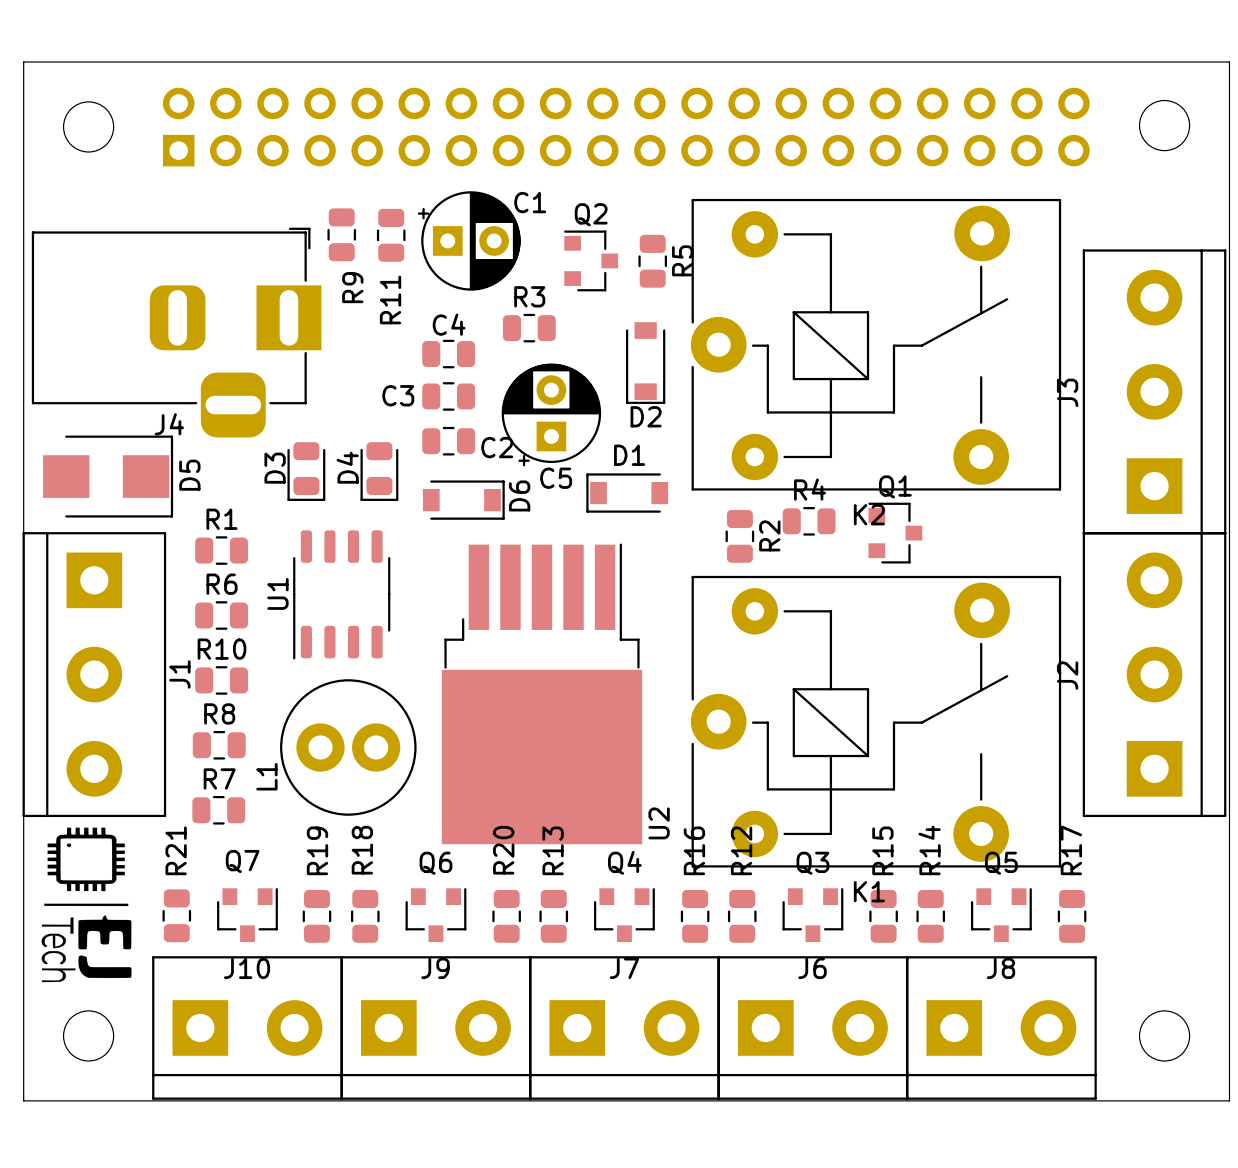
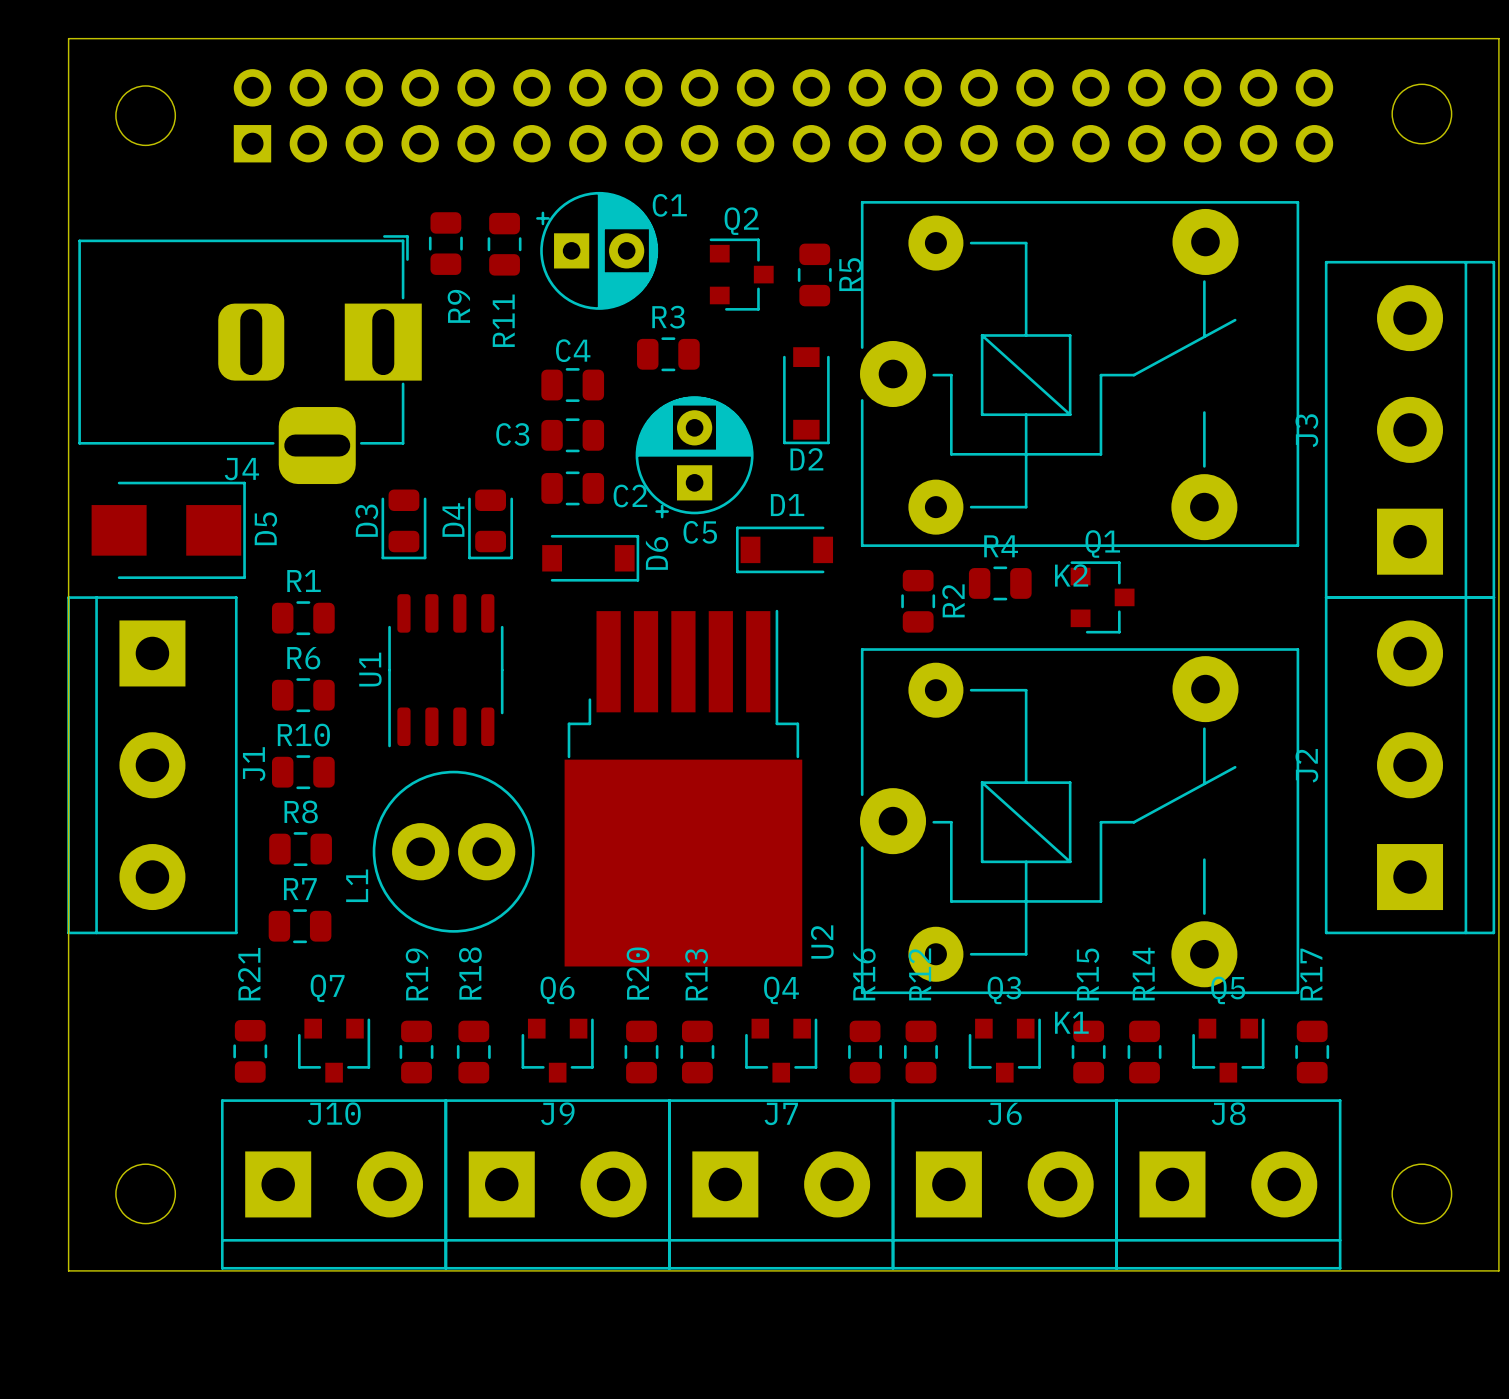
drawing: [41, 827, 132, 983] -> none

